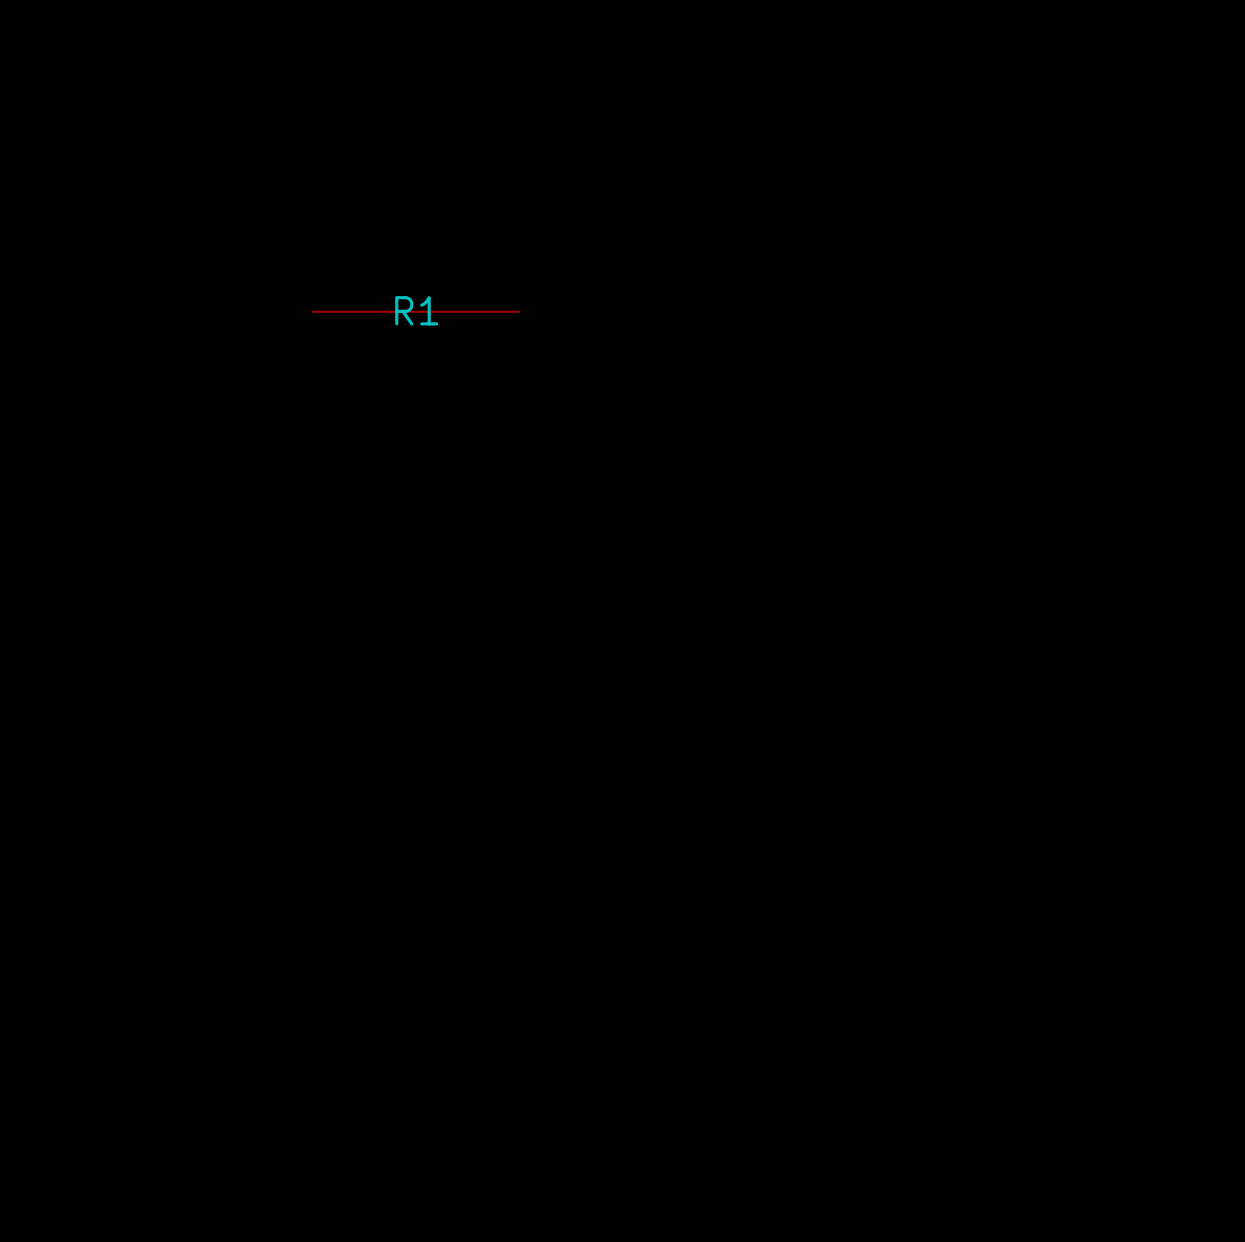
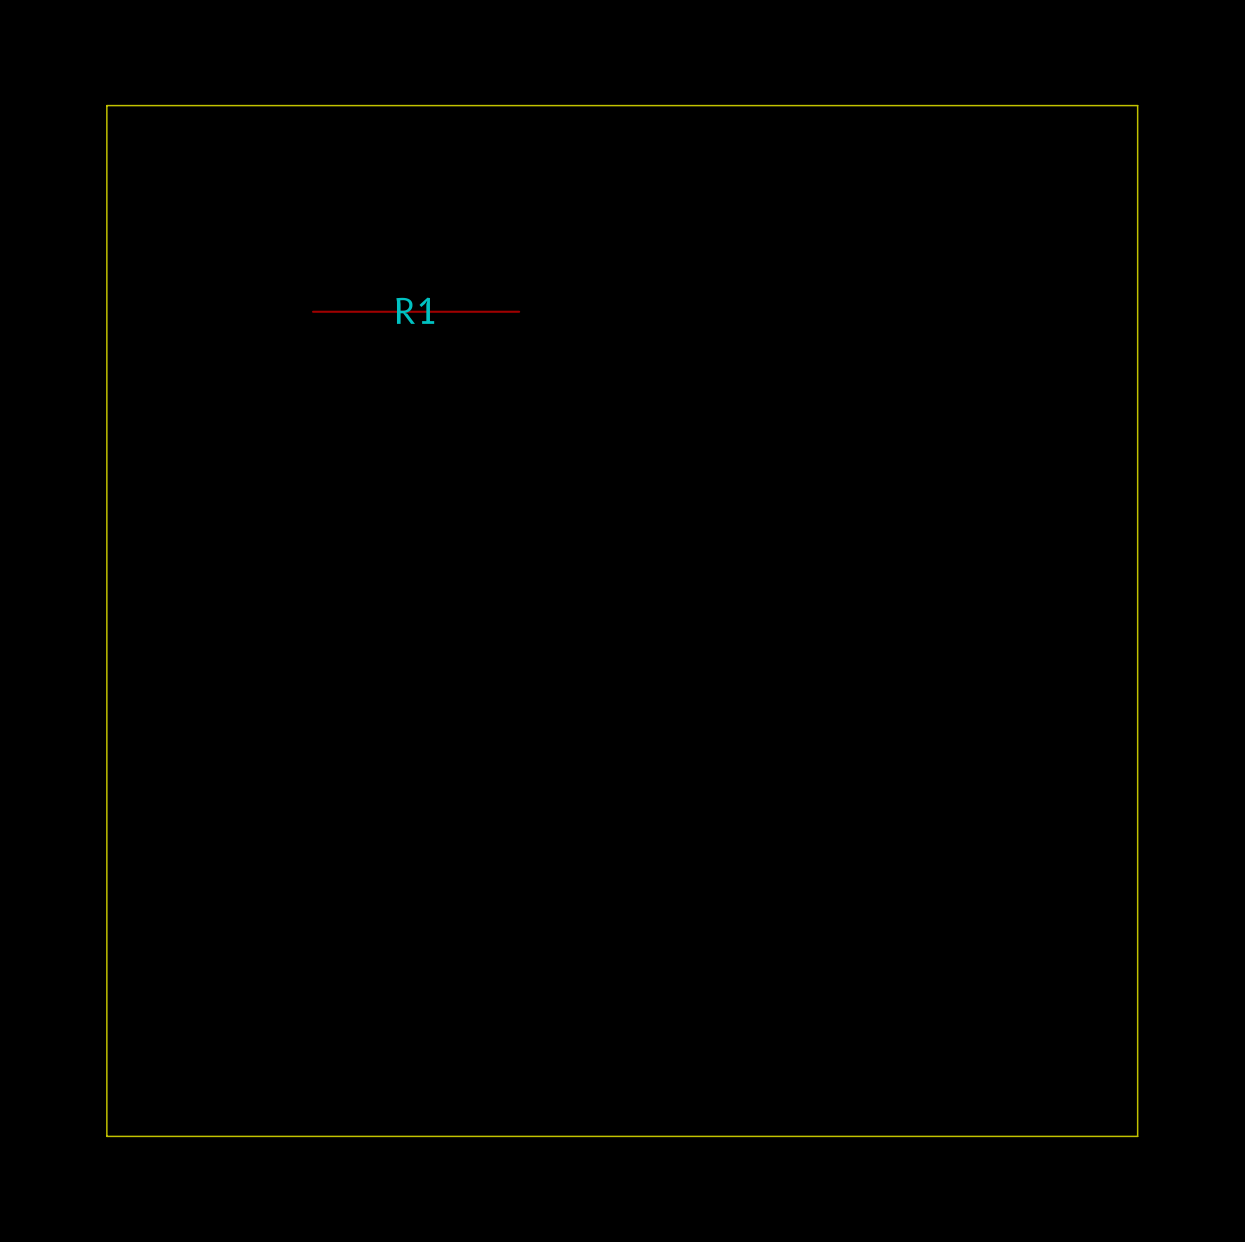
board edge: none -> (106, 105) (1137, 105) (1137, 1136) (106, 1136) (106, 105)

